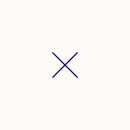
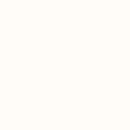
no-connect mark: (65, 65) -> none

